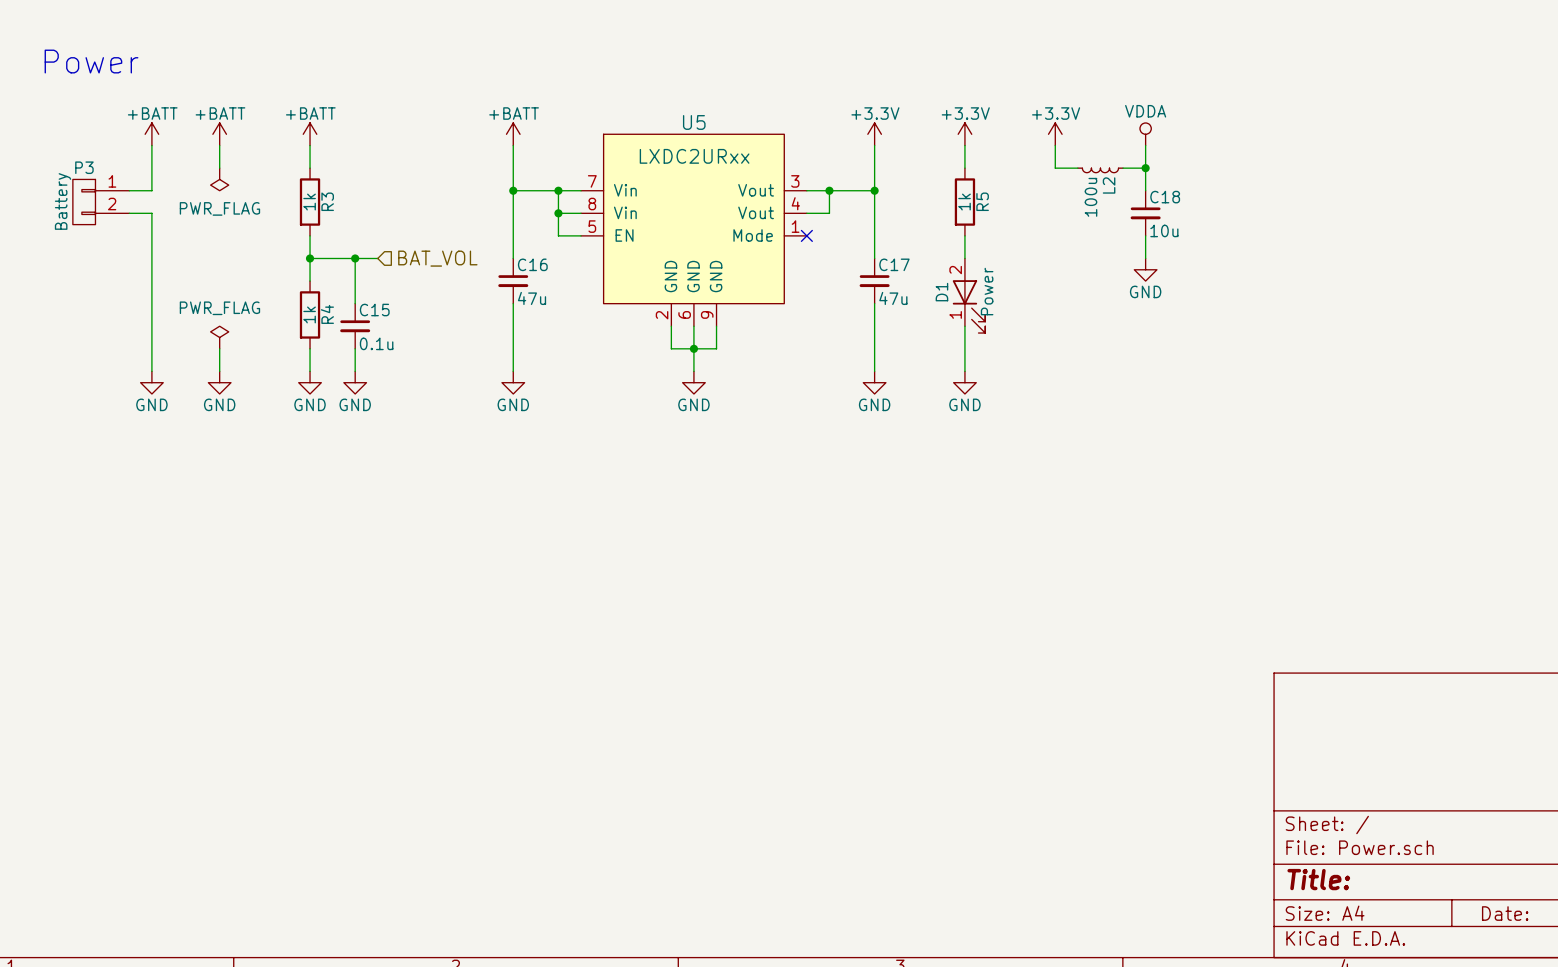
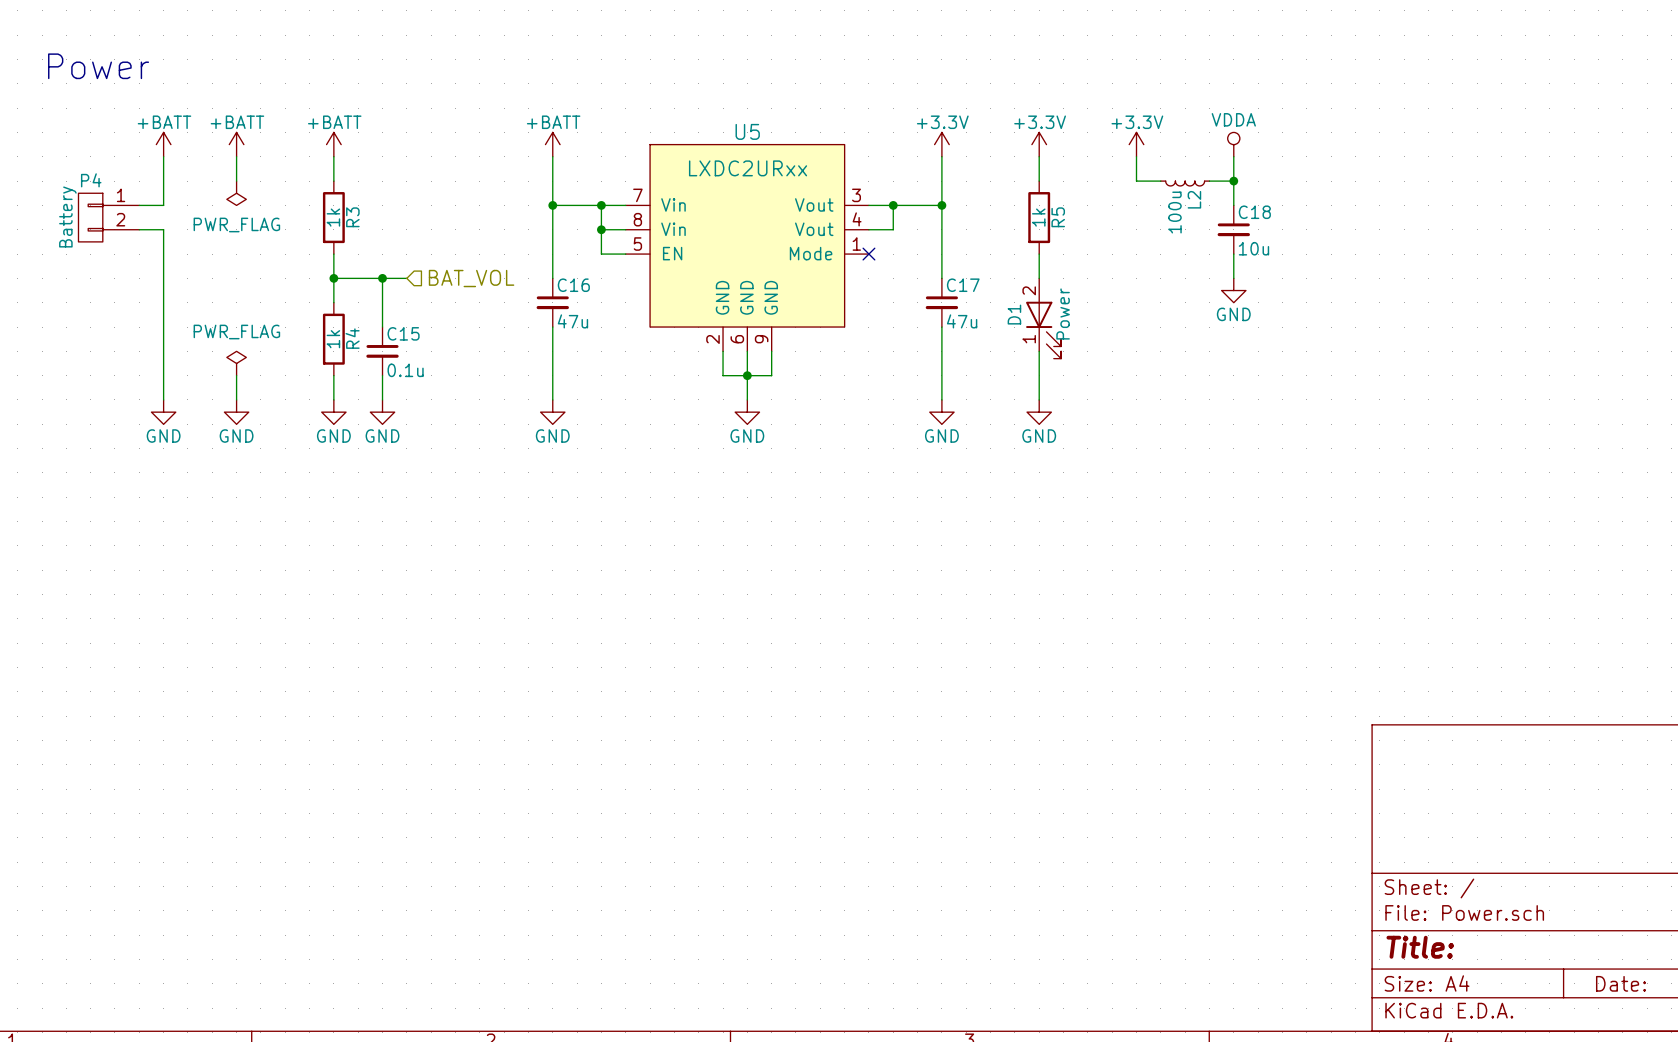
P3 name: P3 (84, 167) -> P4 (91, 180)

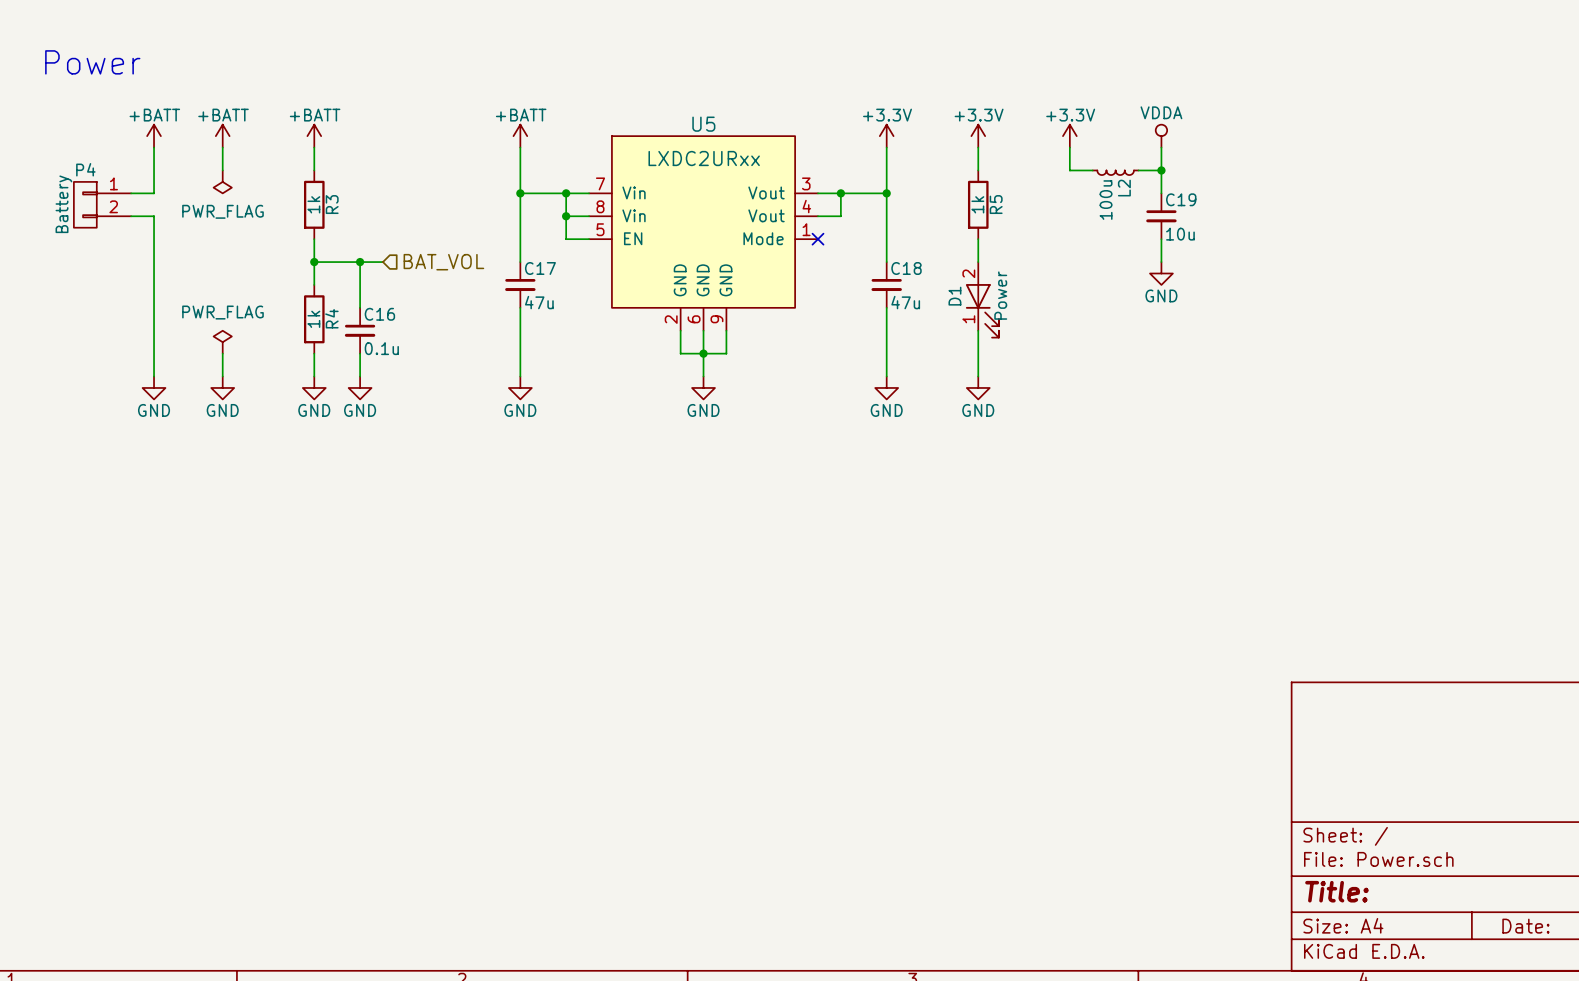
C18 name: C18 (1254, 212) -> C19 (1181, 199)
C16 name: C16 (573, 285) -> C17 (540, 268)
C17 name: C17 (963, 285) -> C18 (906, 268)
C15 name: C15 (403, 333) -> C16 (379, 314)

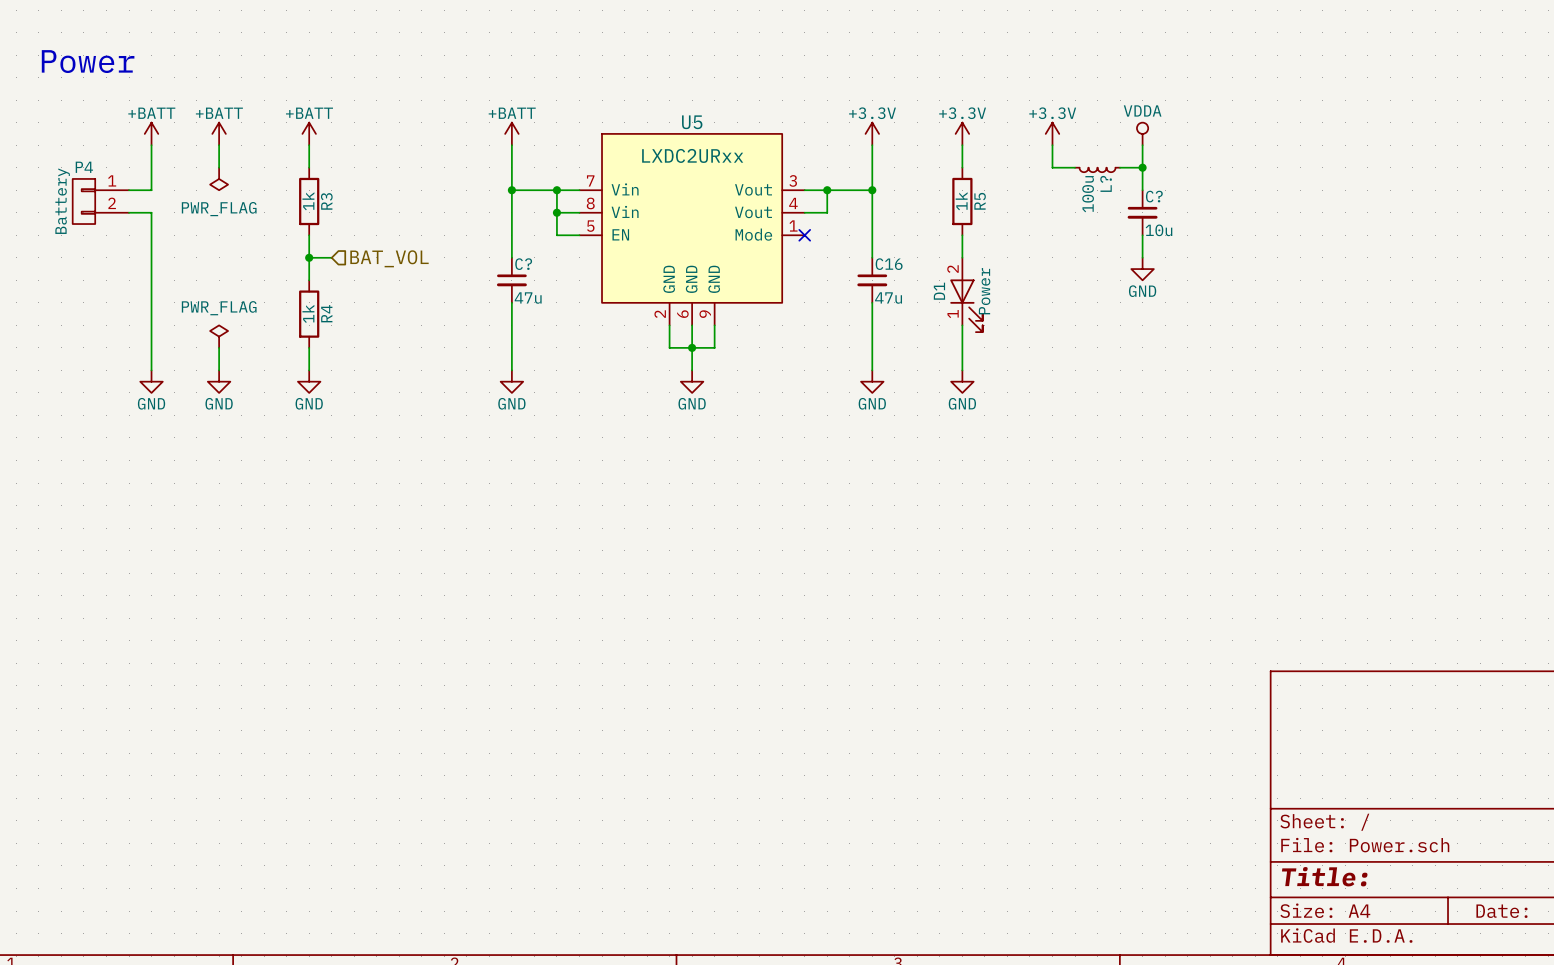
L2 name: L2 (1124, 188) -> L? (1106, 183)
C19 name: C19 (1181, 199) -> C? (1154, 196)
wire: (337, 262) (382, 262) -> none
wire: (360, 262) (360, 307) -> none
junction: (360, 262) -> none
hierarchical label position: BAT_VOL (443, 262) -> BAT_VOL (389, 258)
C17 name: C17 (540, 268) -> C? (523, 264)
C18 name: C18 (906, 268) -> C16 (889, 264)
C16: 0.1u (360, 330) -> none
wire: (360, 353) (360, 376) -> none
power symbol: GND (360, 387) -> none

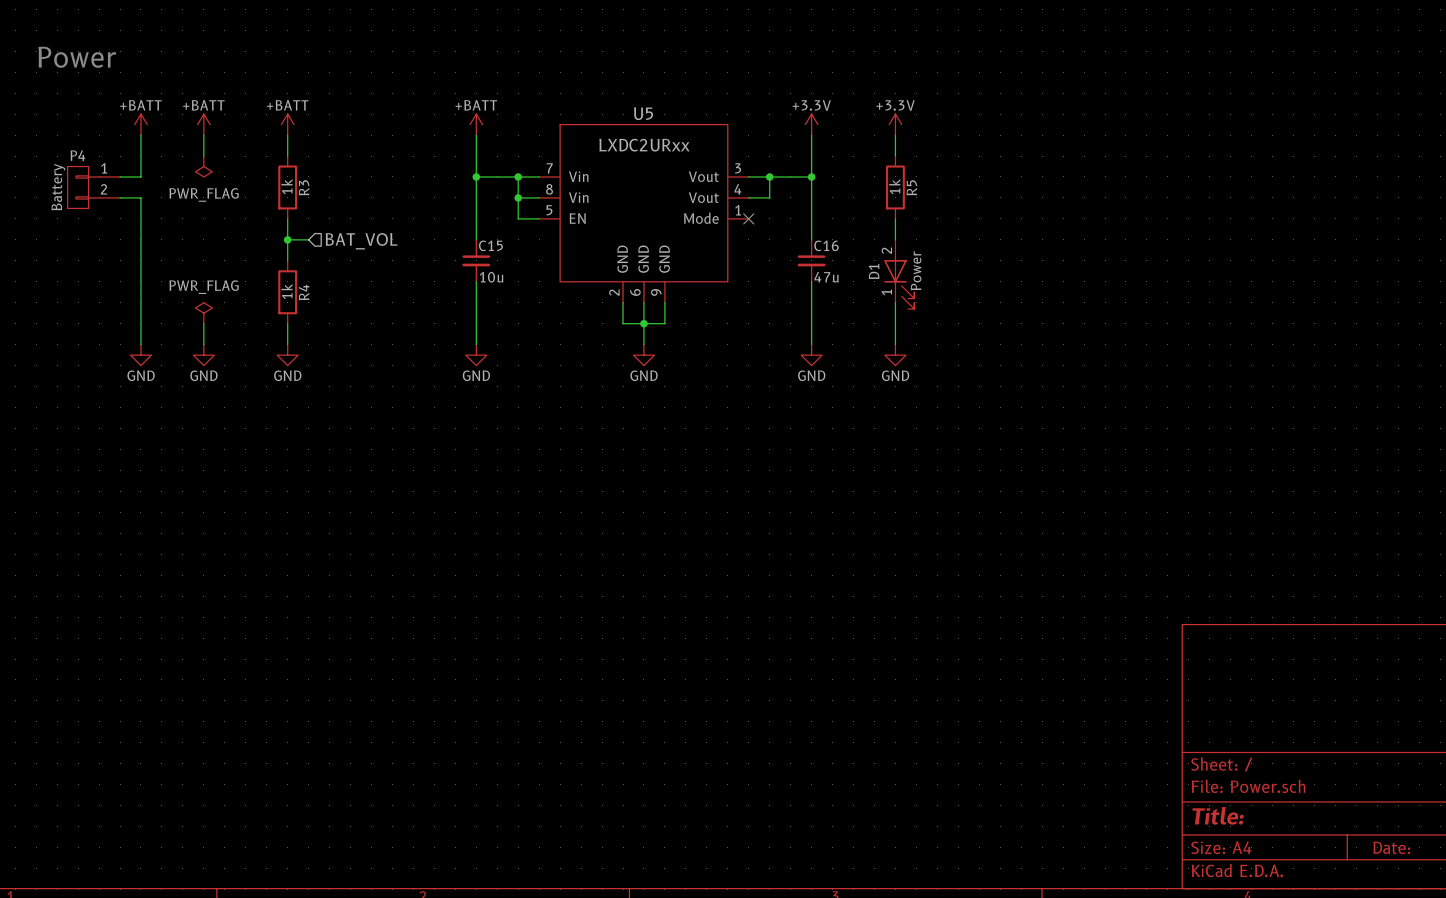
power symbol: +3.3V (1052, 133) -> none
power symbol: VDDA (1142, 133) -> none
wire: (1052, 145) (1052, 167) (1075, 167) -> none
wire: (1142, 145) (1142, 190) -> none
wire: (1120, 167) (1142, 167) -> none
junction: (1142, 167) -> none
L?: 100u (1097, 169) -> none
C?: 10u (1142, 212) -> none
wire: (1142, 235) (1142, 257) -> none
C? name: C? (523, 264) -> C15 (490, 245)
power symbol: GND (1142, 269) -> none
C? value: 47u (528, 298) -> 10u (491, 277)

